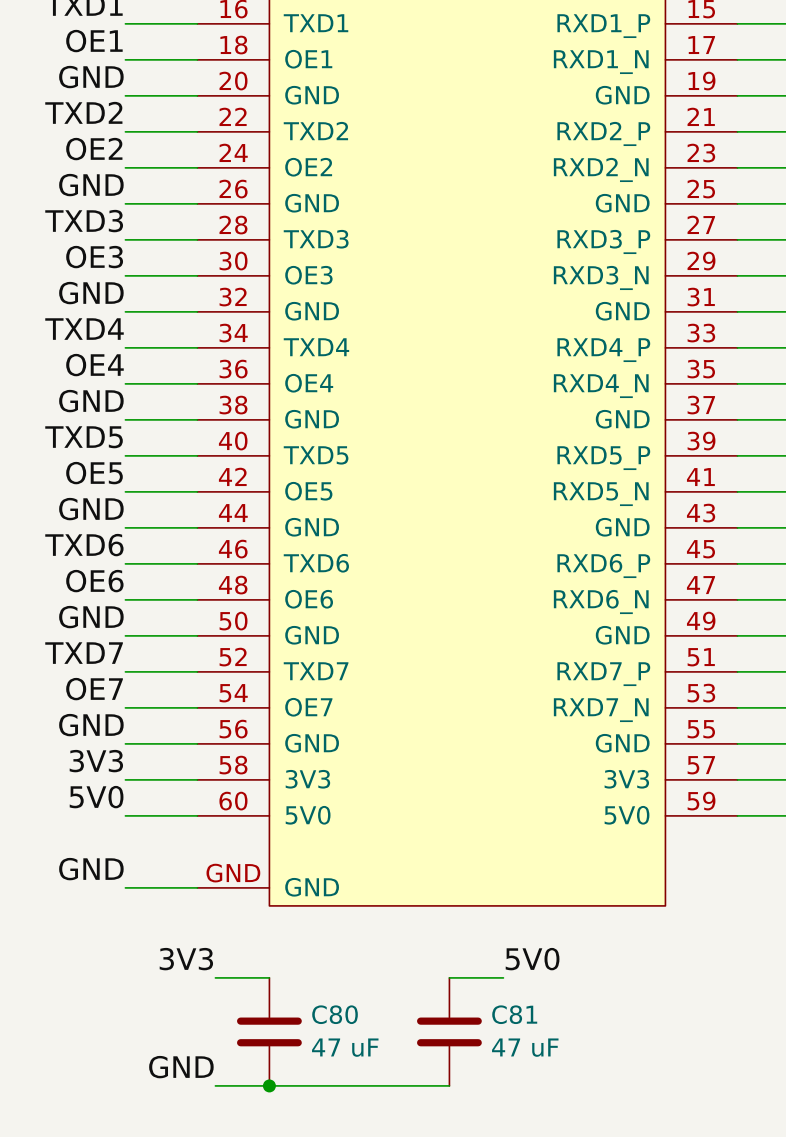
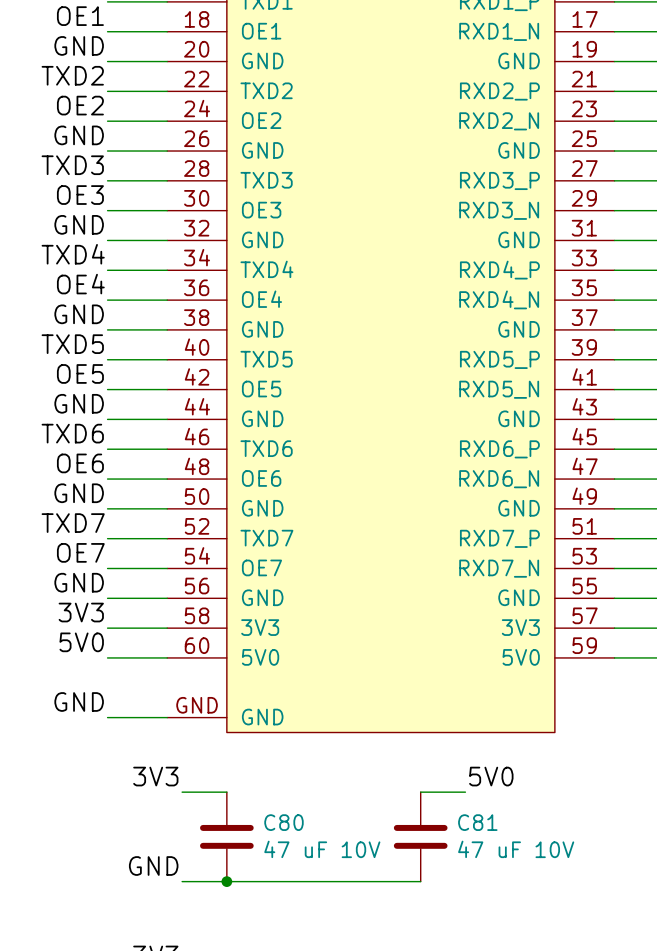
label position: 5V0 (532, 959) -> 5V0 (491, 776)
wire: (449, 977) (503, 977) -> (465, 792) (420, 792)
C81 position: (449, 1031) -> (420, 836)
C80 value: 47 uF (345, 1047) -> 47 uF 10V (322, 849)
C81 value: 47 uF (525, 1047) -> 47 uF 10V (516, 849)
wire: none -> (375, 881) (420, 881)

